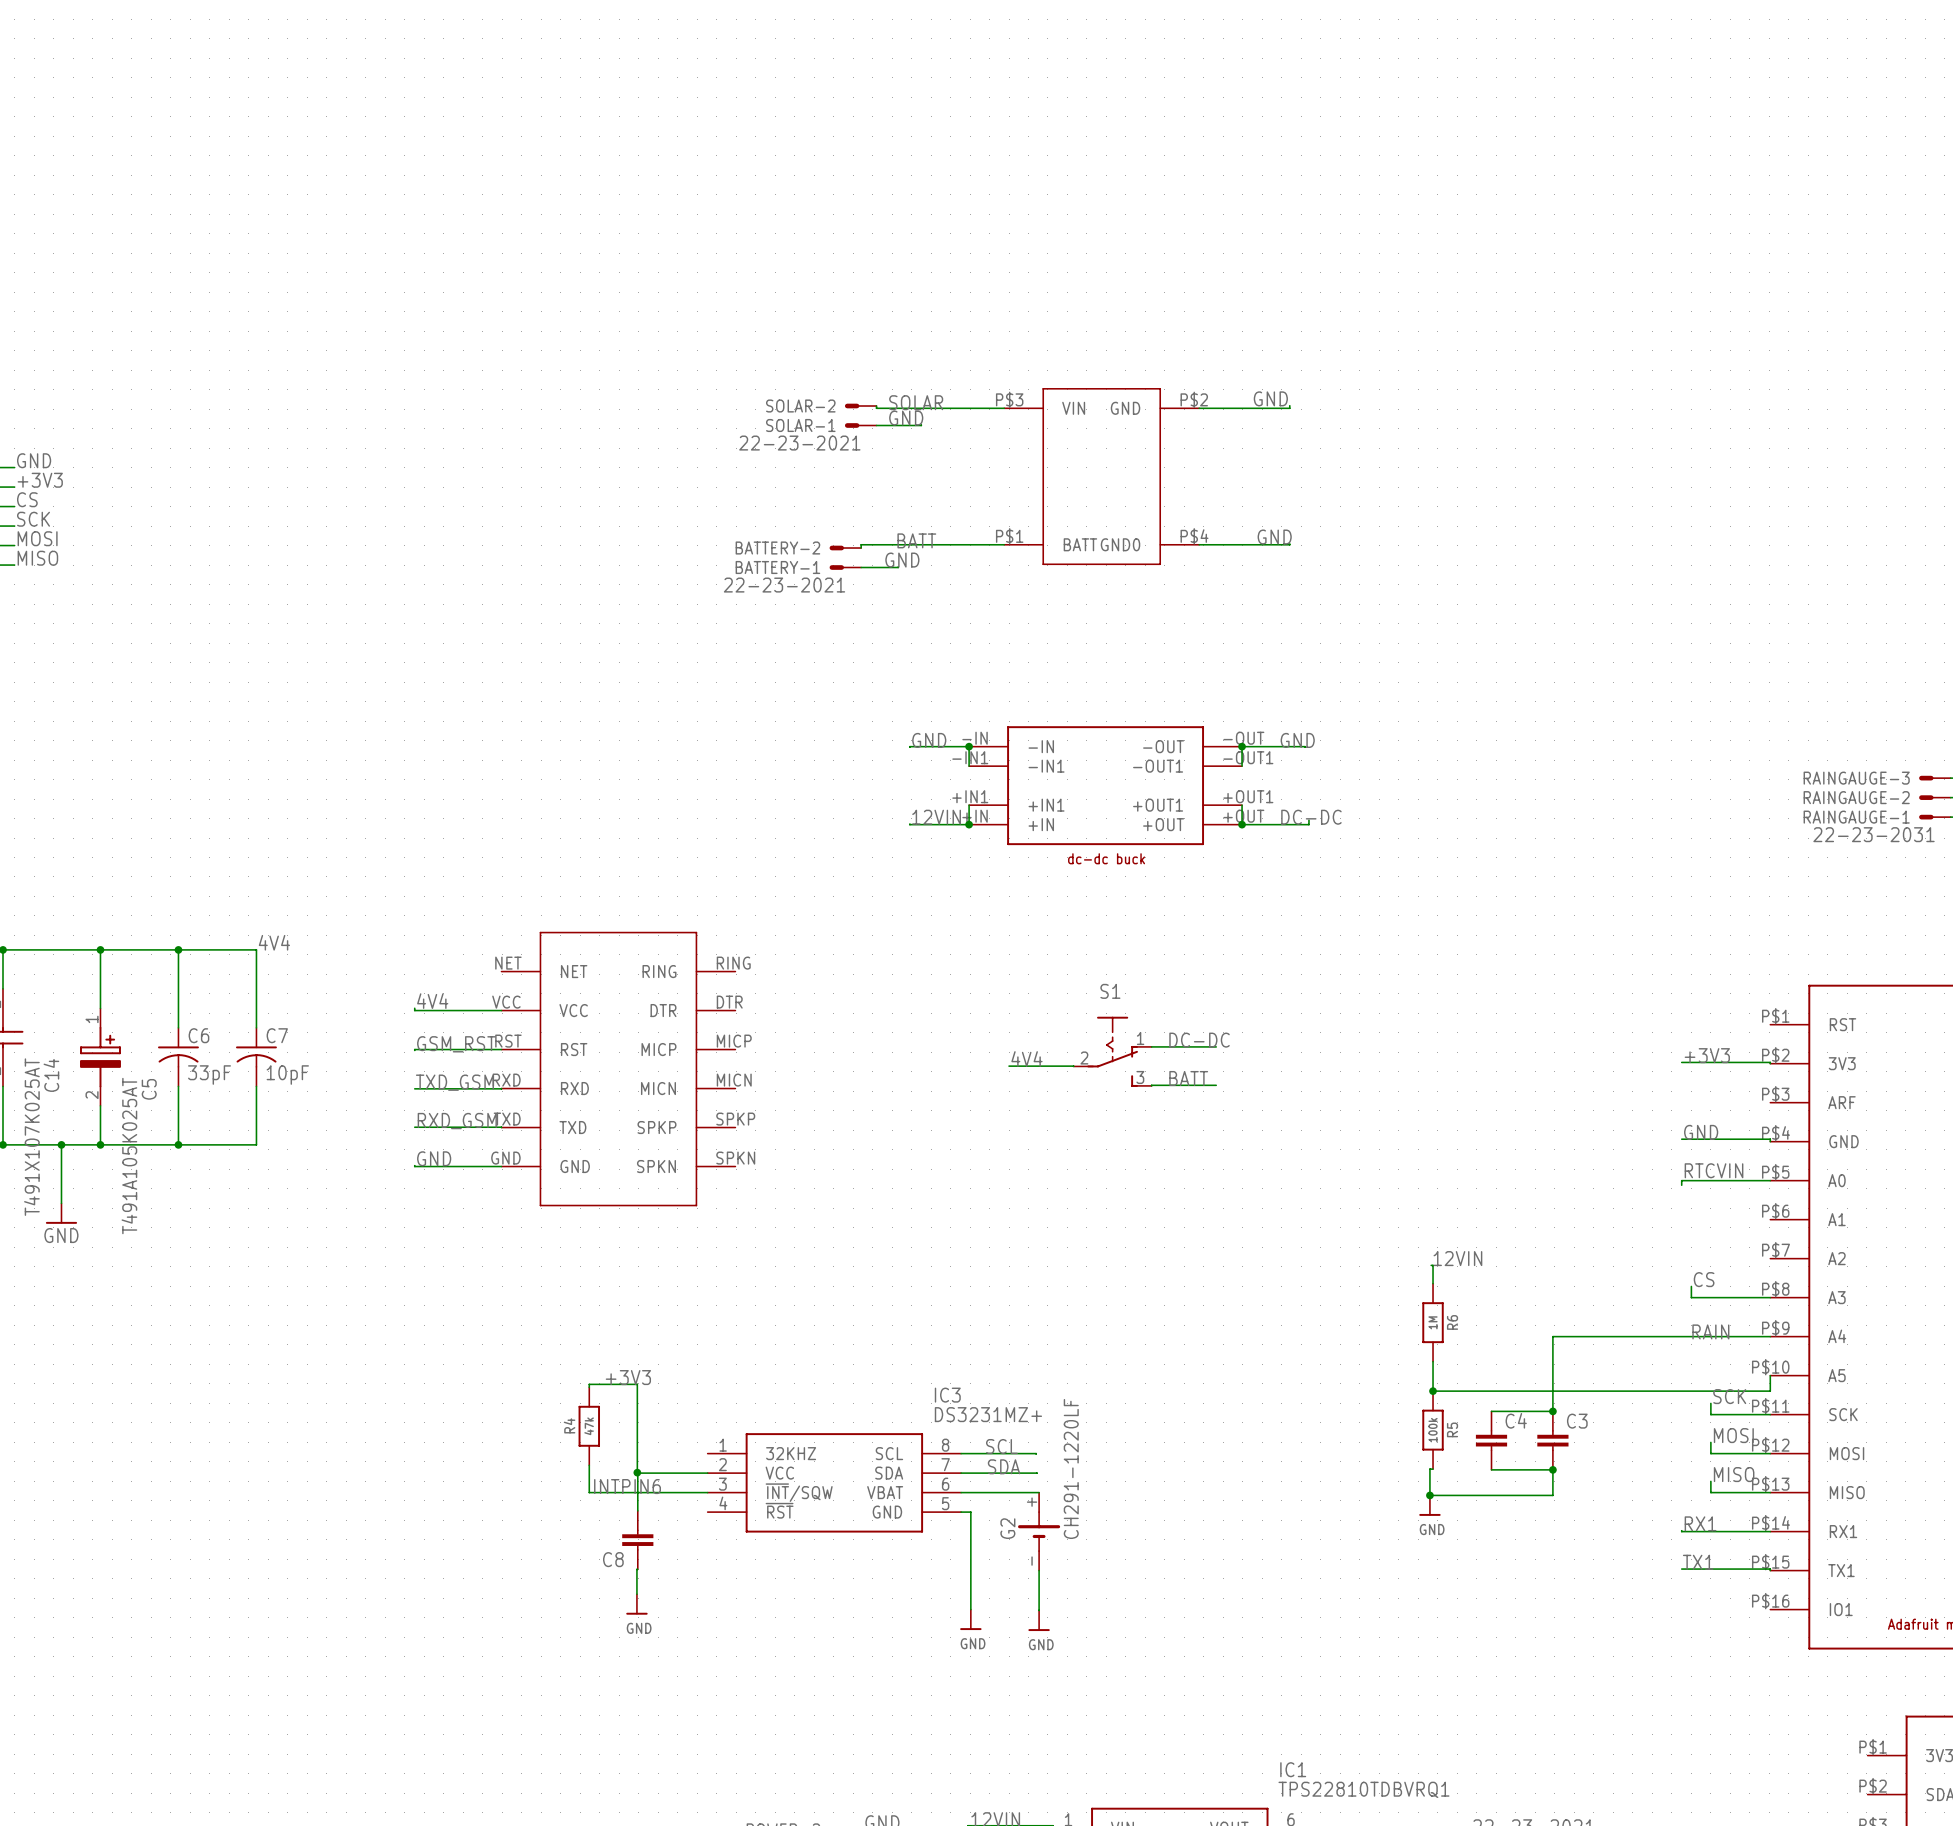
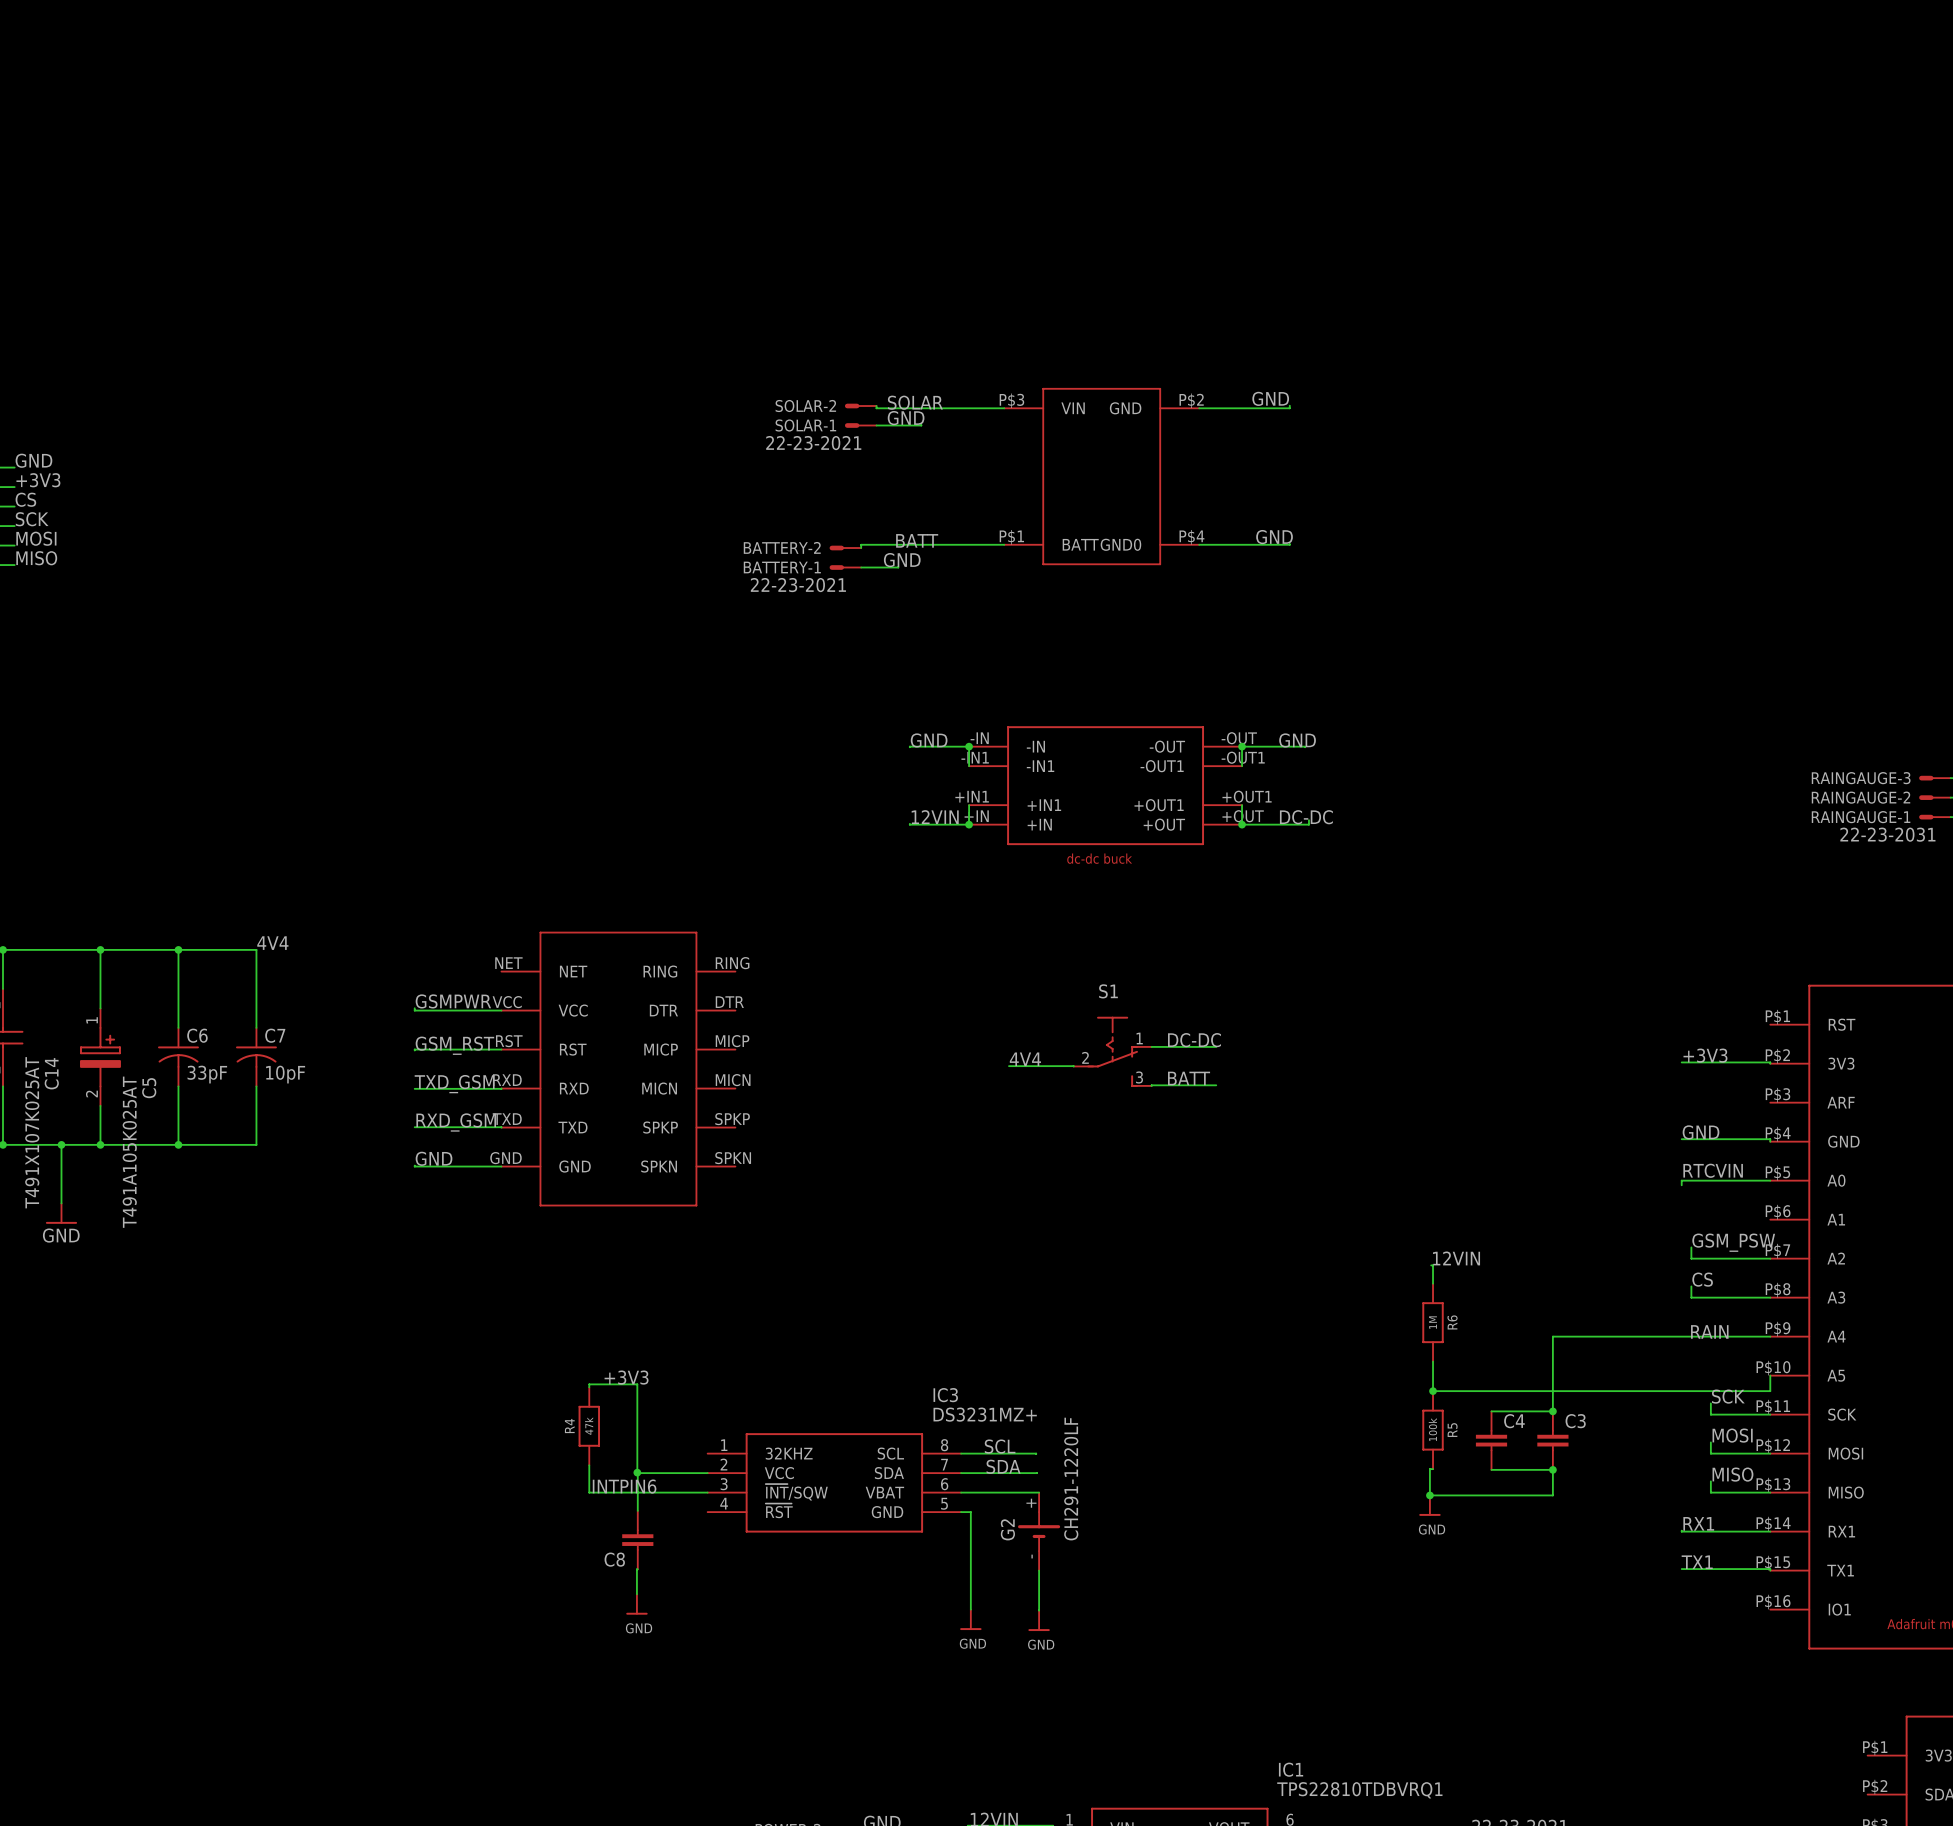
label: 4V4 (432, 1001) -> GSMPWR (453, 1001)
label: none -> GSM_PSW (1733, 1242)
wire: none -> (1691, 1247) (1691, 1258) (1770, 1258)

